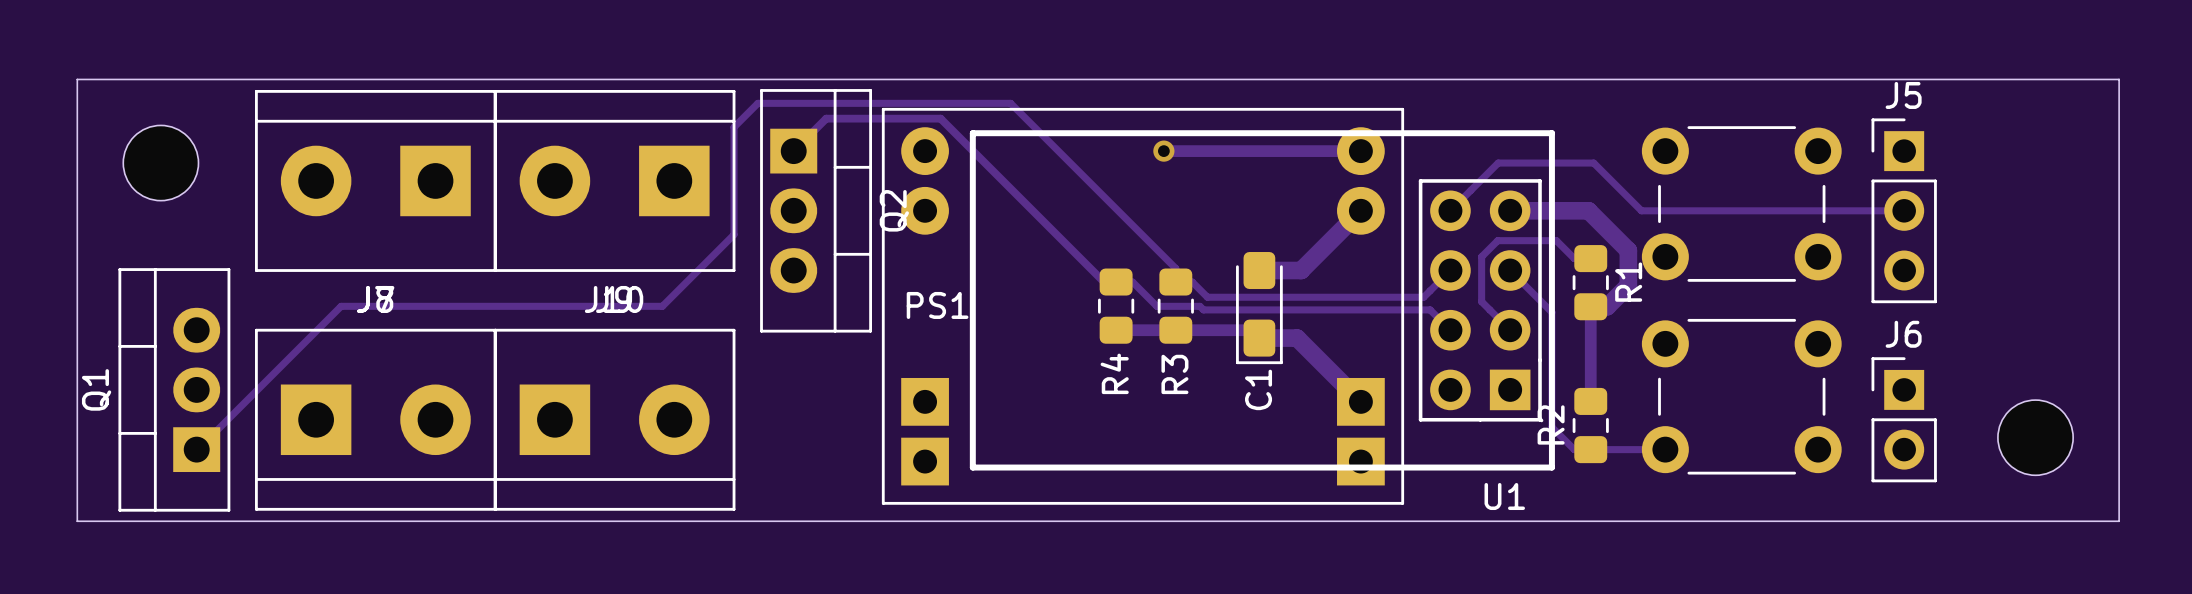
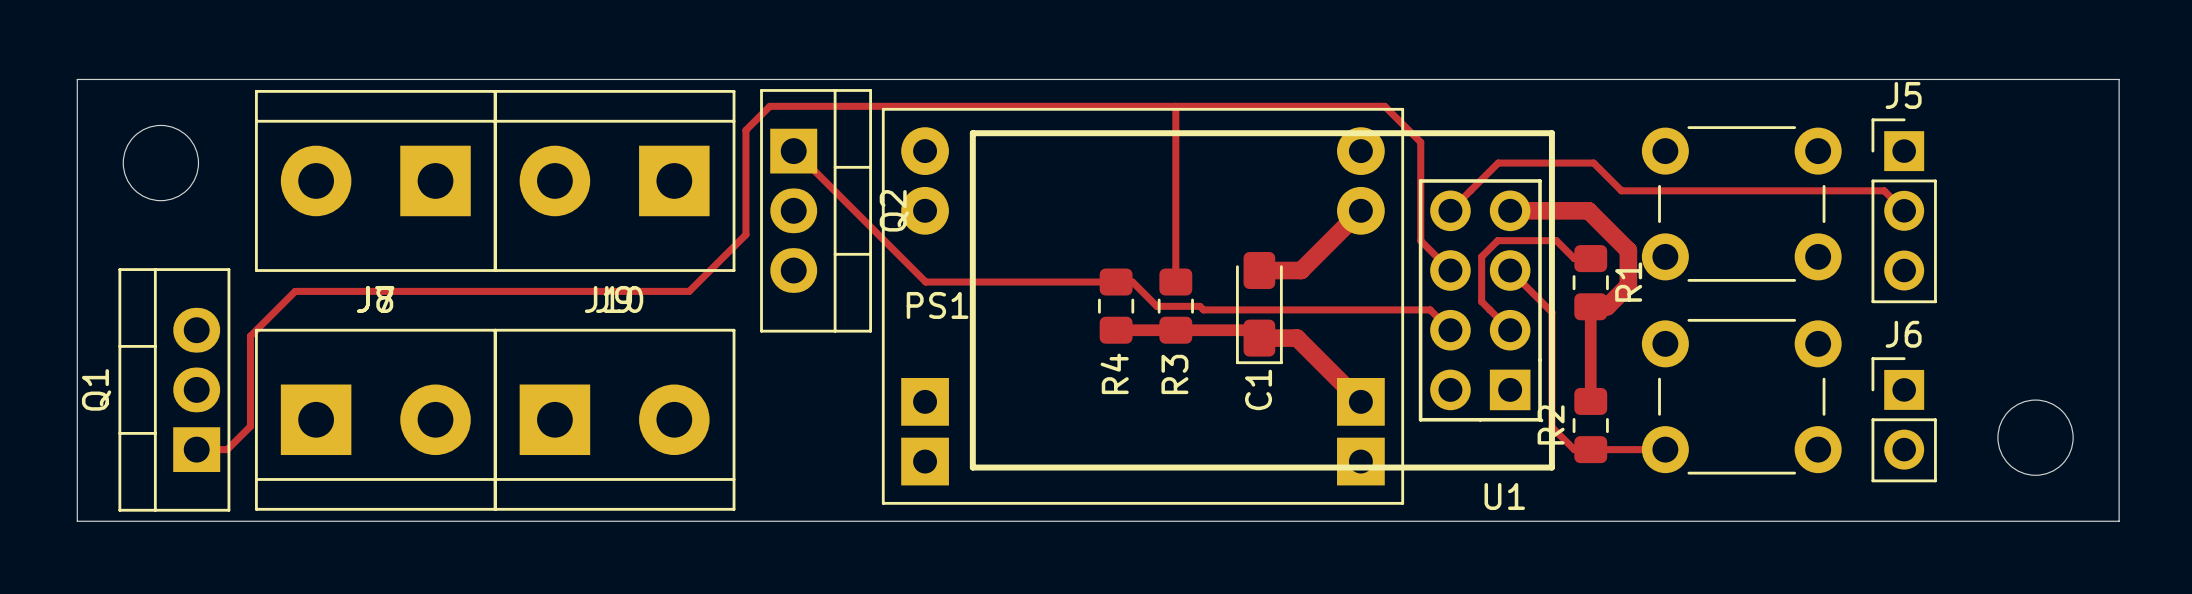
track: none -> (1175, 106) (1175, 268)
track: (793, 151) (826, 118) (940, 118) (1104, 282) -> (793, 151) (925, 282) (1104, 282)
track: (1163, 151) (1360, 151) -> none
via: (1163, 151) -> none
track: (1621, 190) (1641, 210) (1904, 210) -> (1621, 190) (1884, 190) (1904, 210)
track: (1175, 268) (1010, 103) (757, 103) (734, 127) (734, 234) (662, 306) (341, 306) (197, 449) -> (1450, 270) (1420, 240) (1420, 142) (1384, 106) (769, 106) (745, 130) (745, 234) (689, 291) (295, 291) (250, 336) (250, 426) (227, 449) (197, 449)
track: (1450, 270) (1423, 297) (1207, 297) (1192, 282) (1175, 282) -> none

